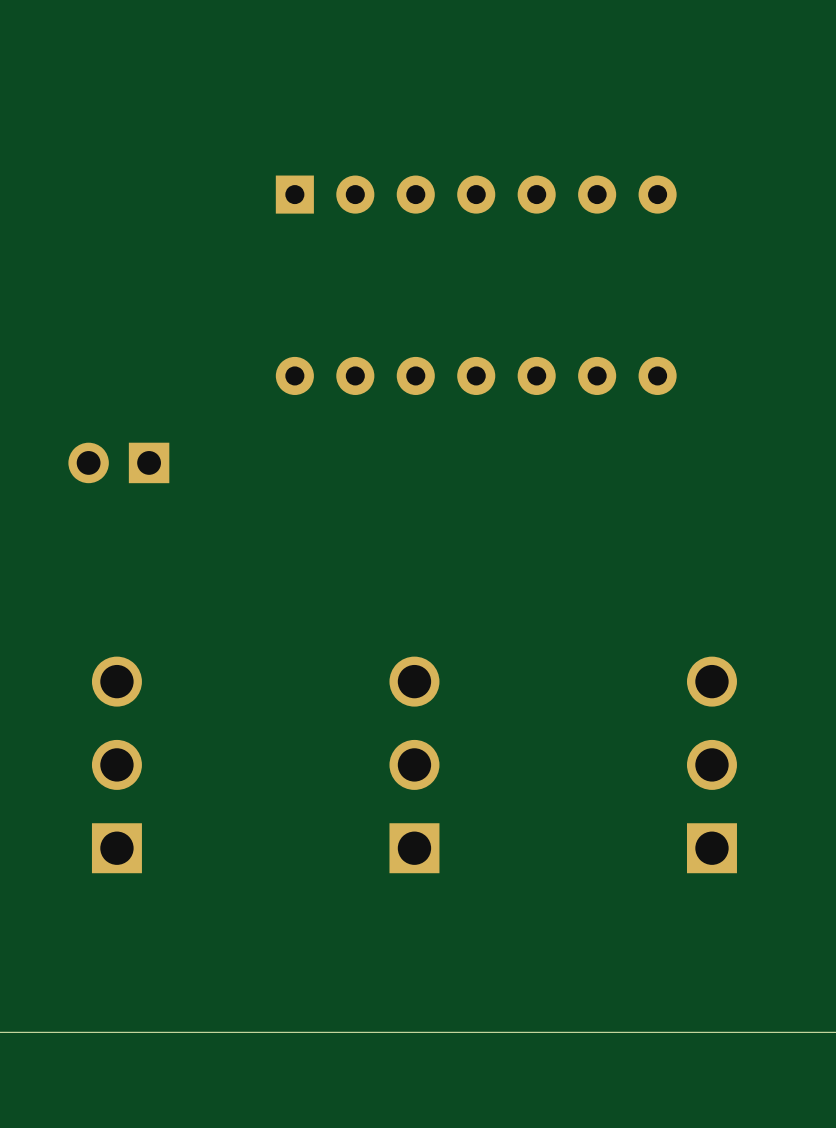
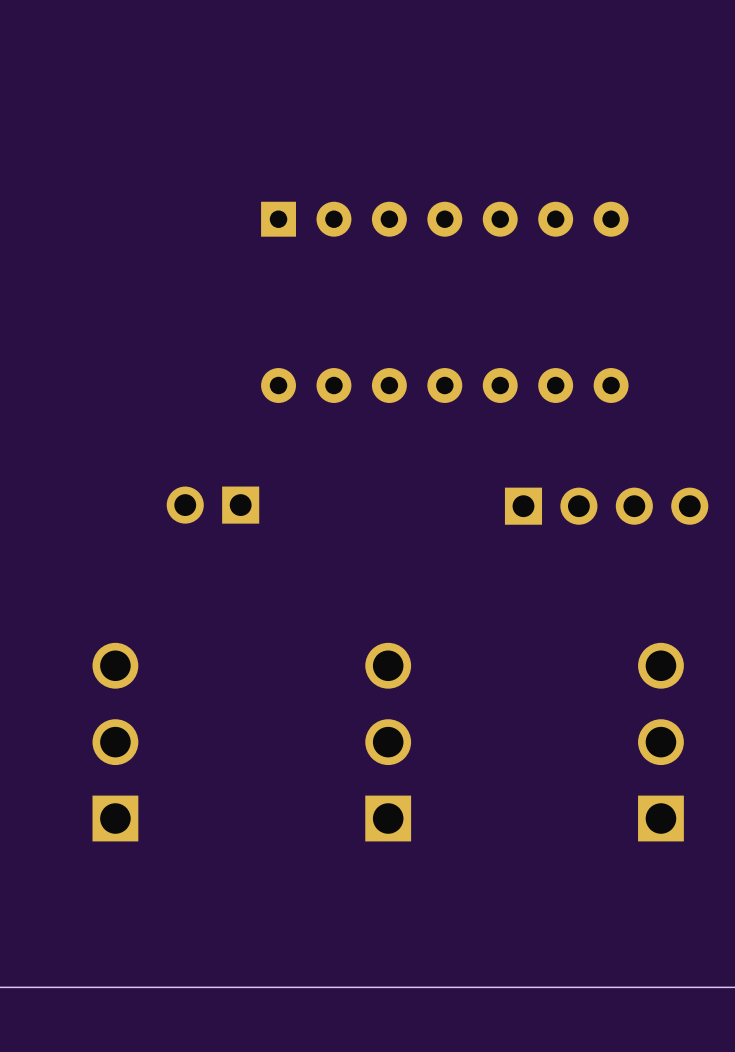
part position: (118, 462) -> (212, 505)
part: none -> (606, 506)

